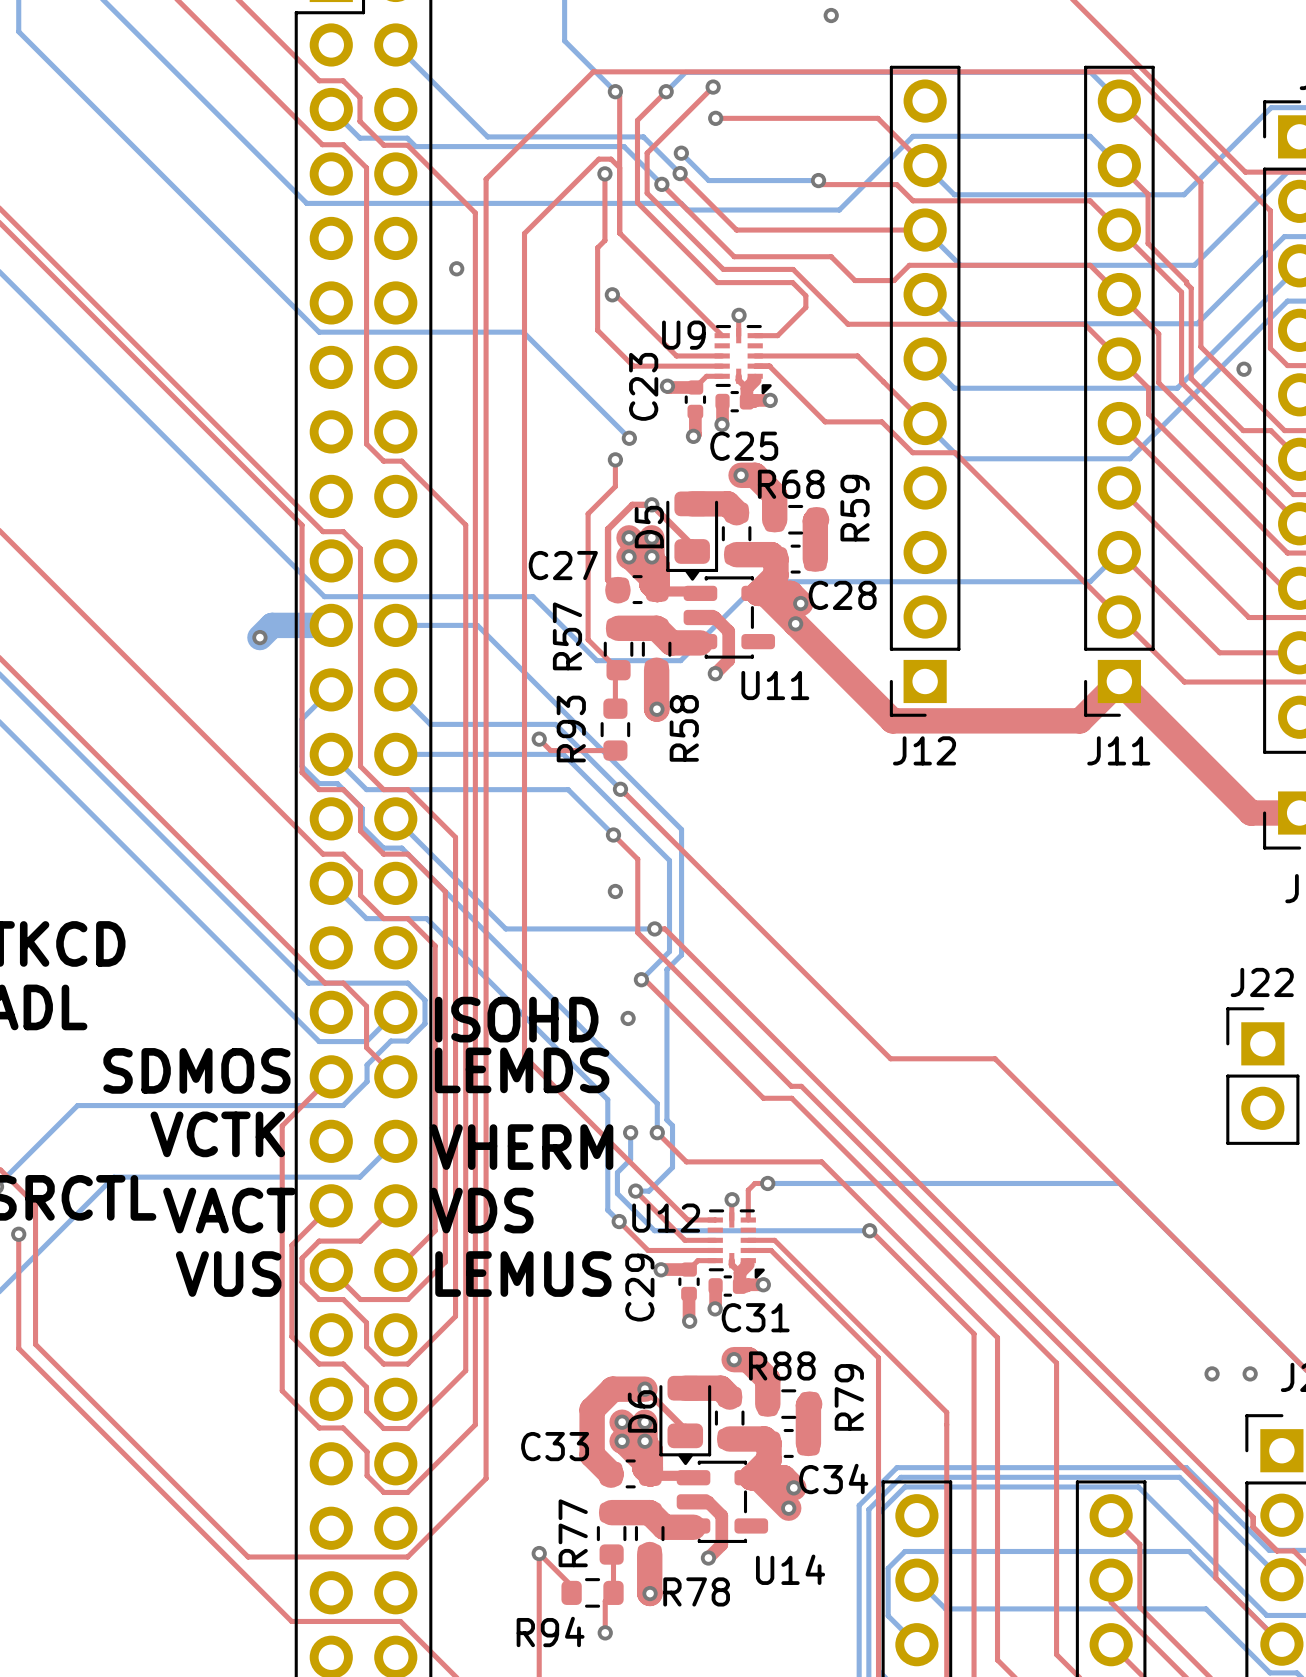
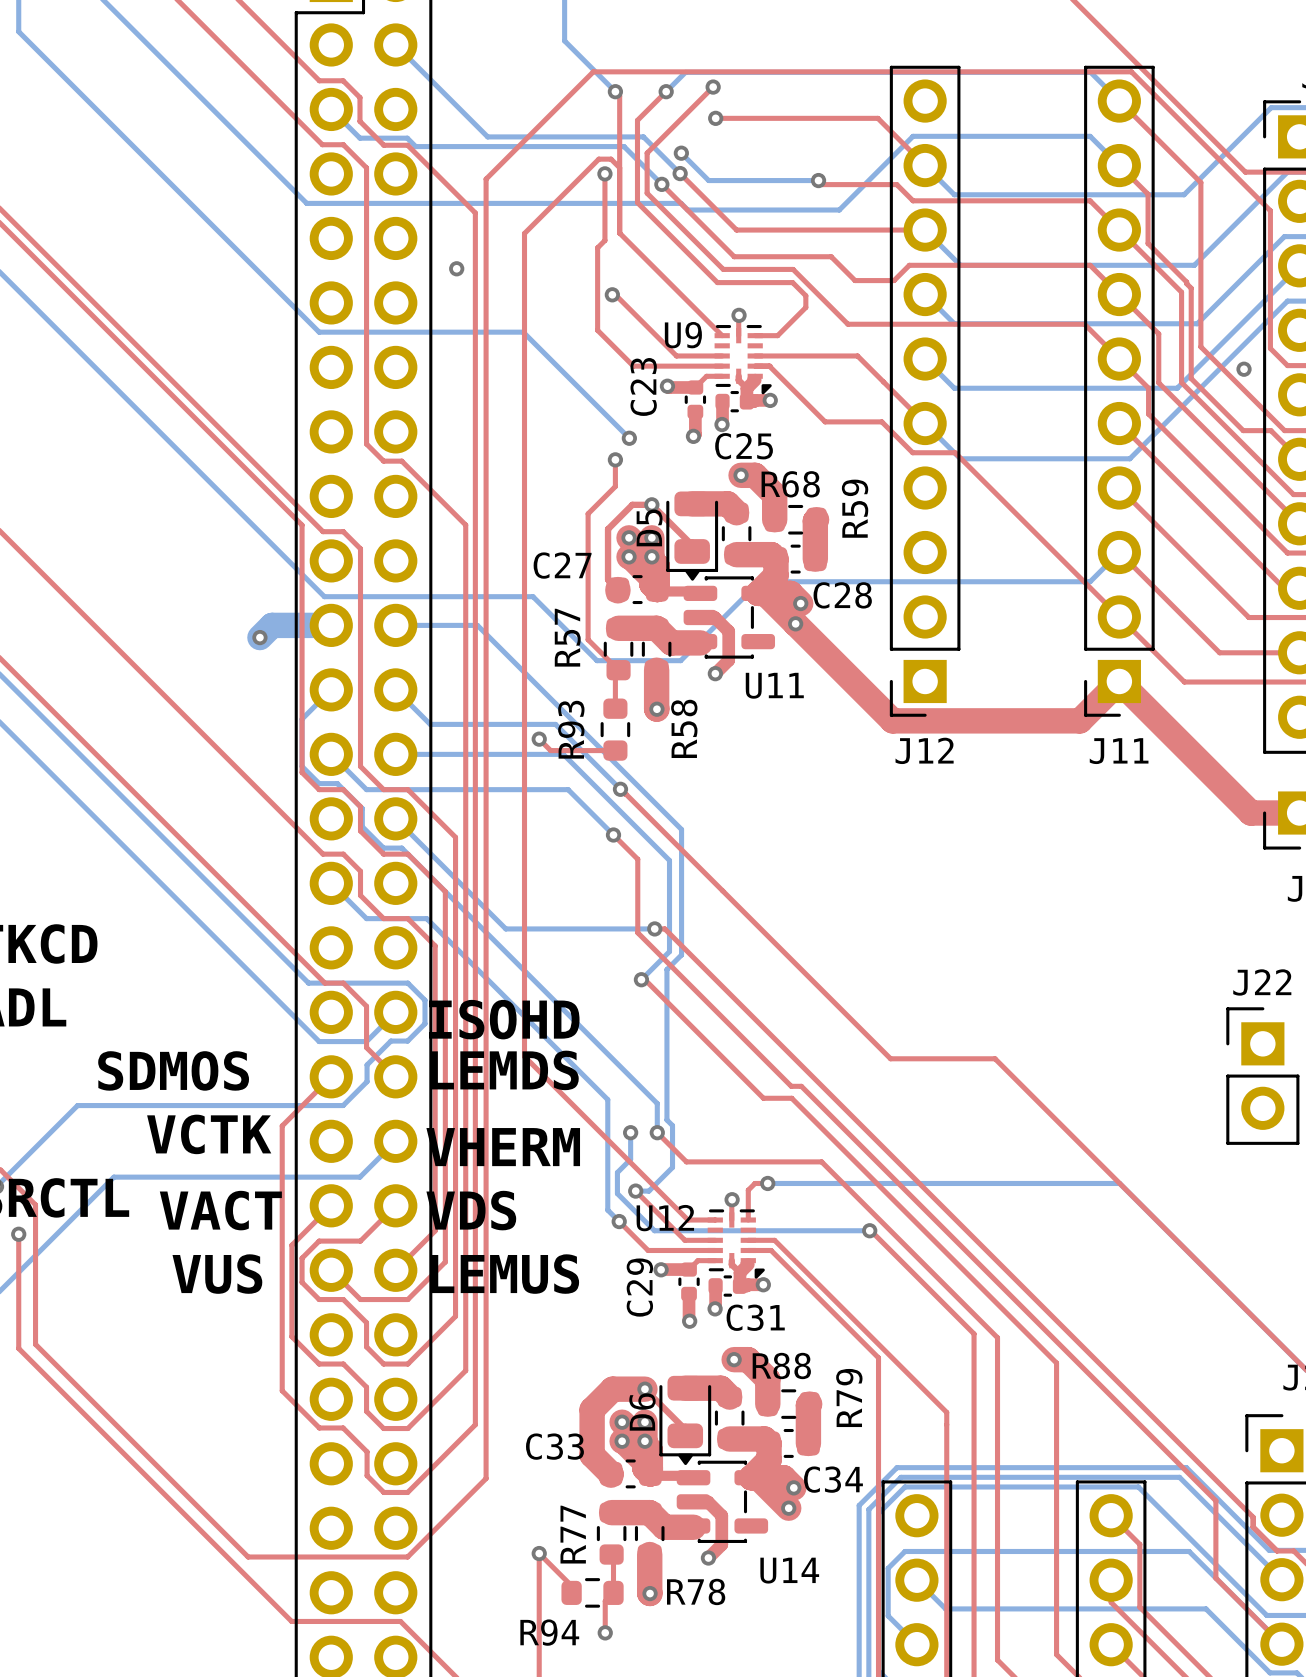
via: (831, 15) -> none
via: (615, 891) -> none
via: (628, 1018) -> none
via: (1212, 1373) -> none
via: (1250, 1373) -> none

